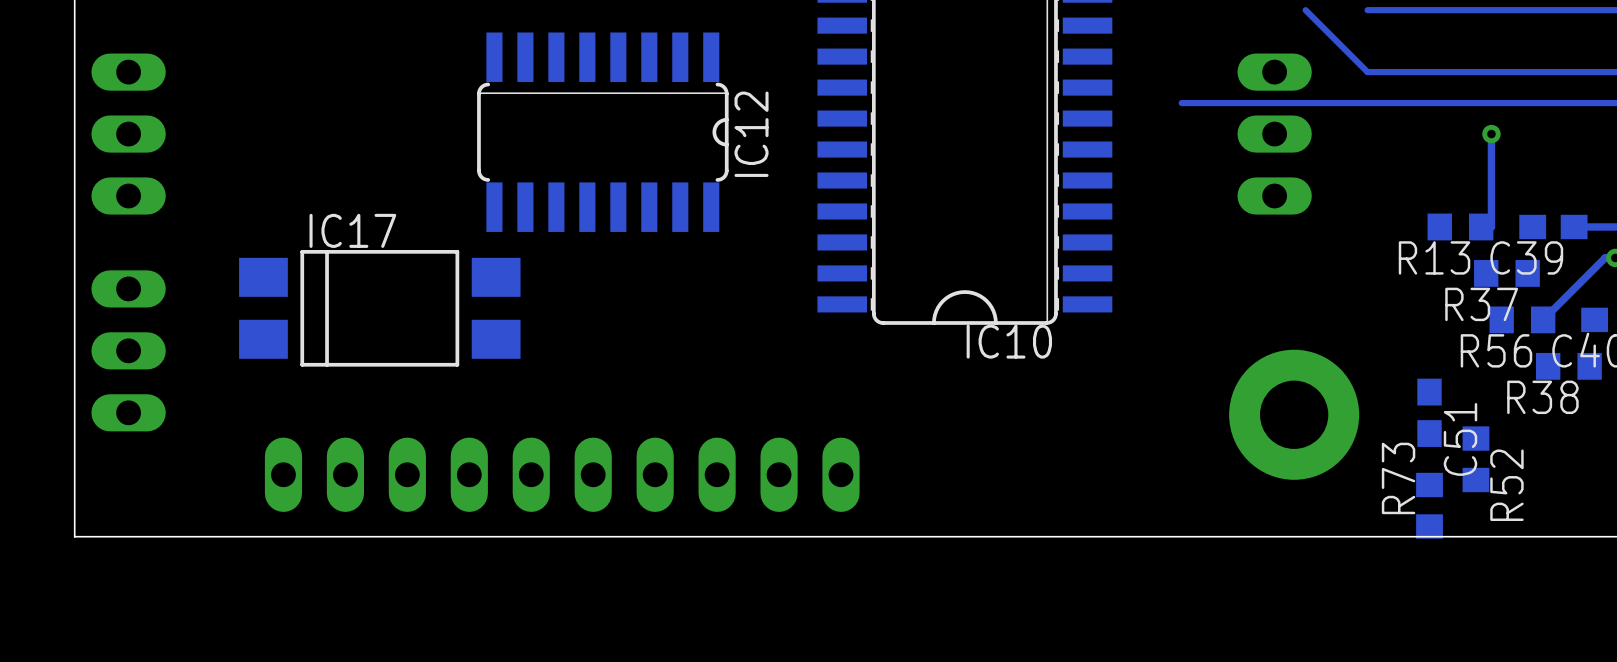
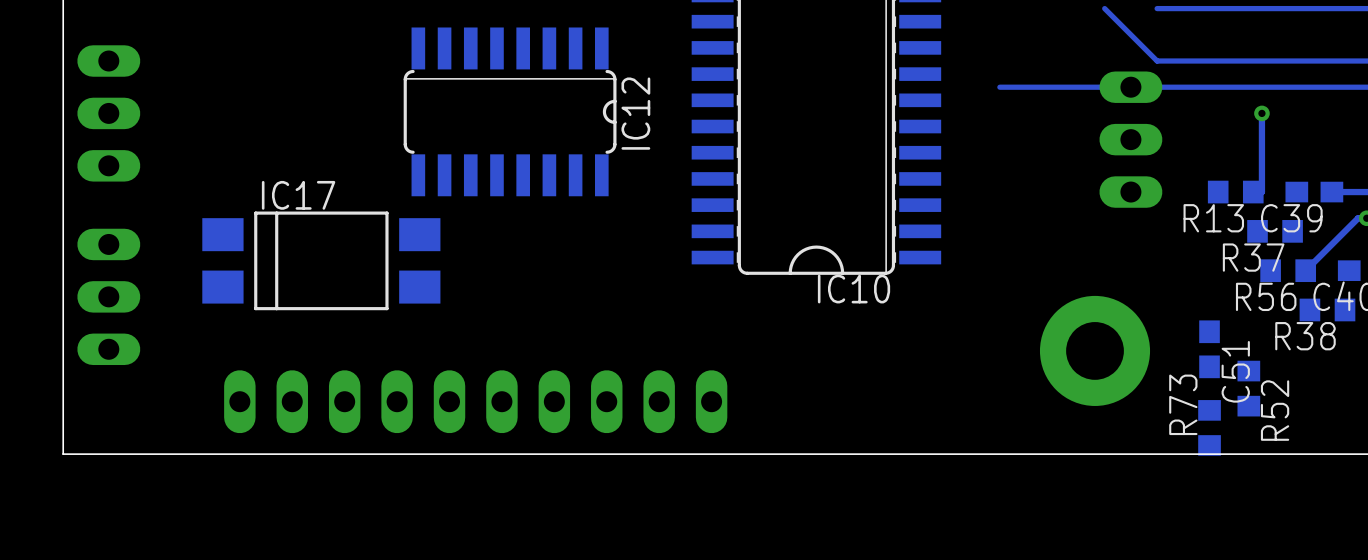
part position: (1274, 134) -> (1130, 139)

